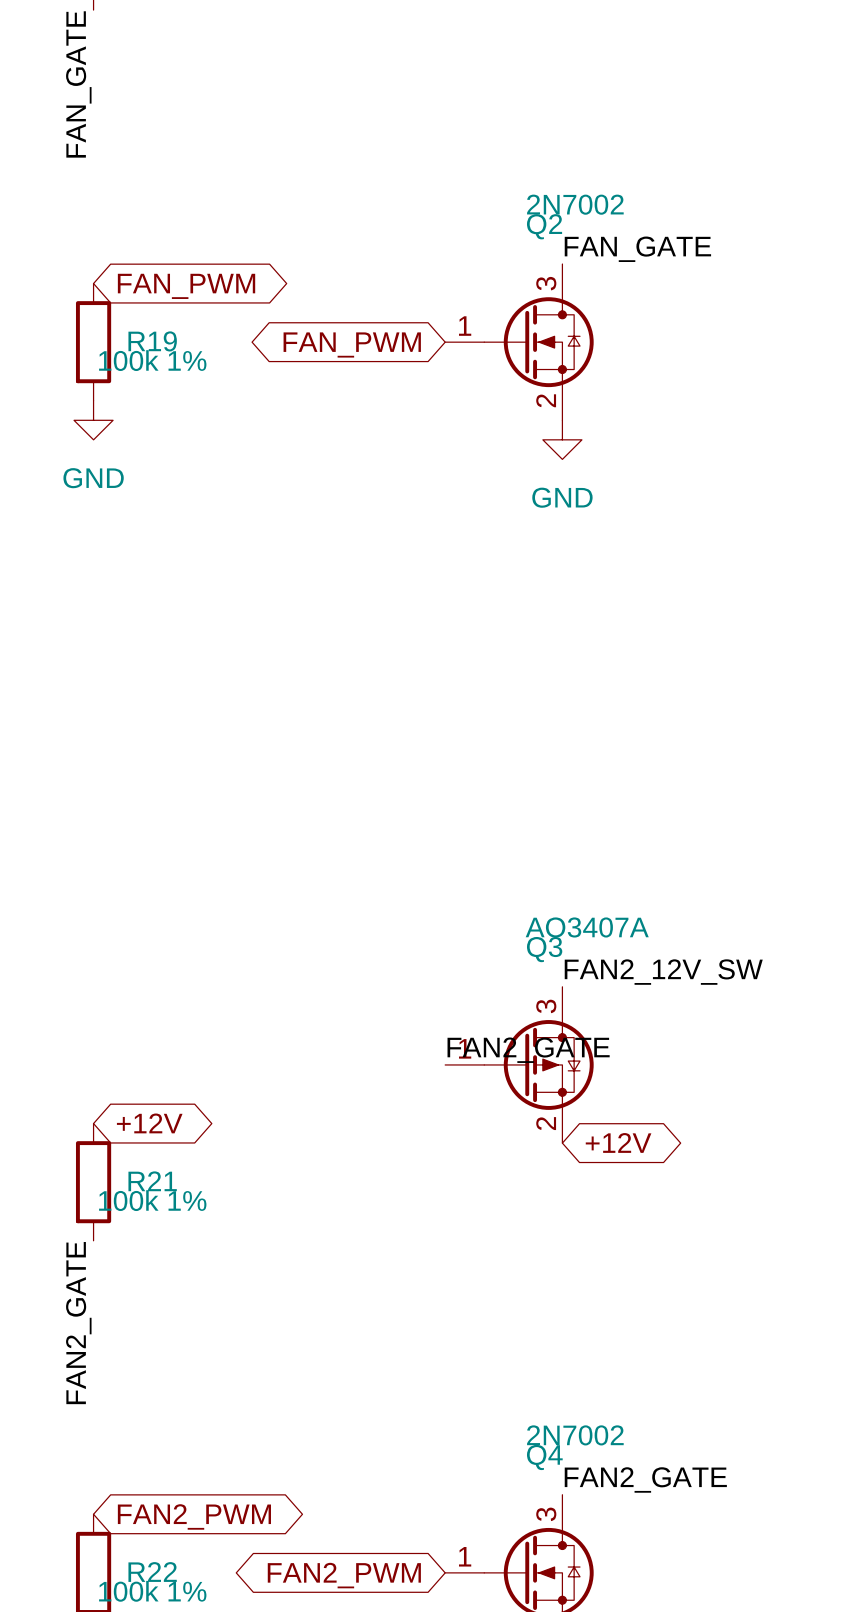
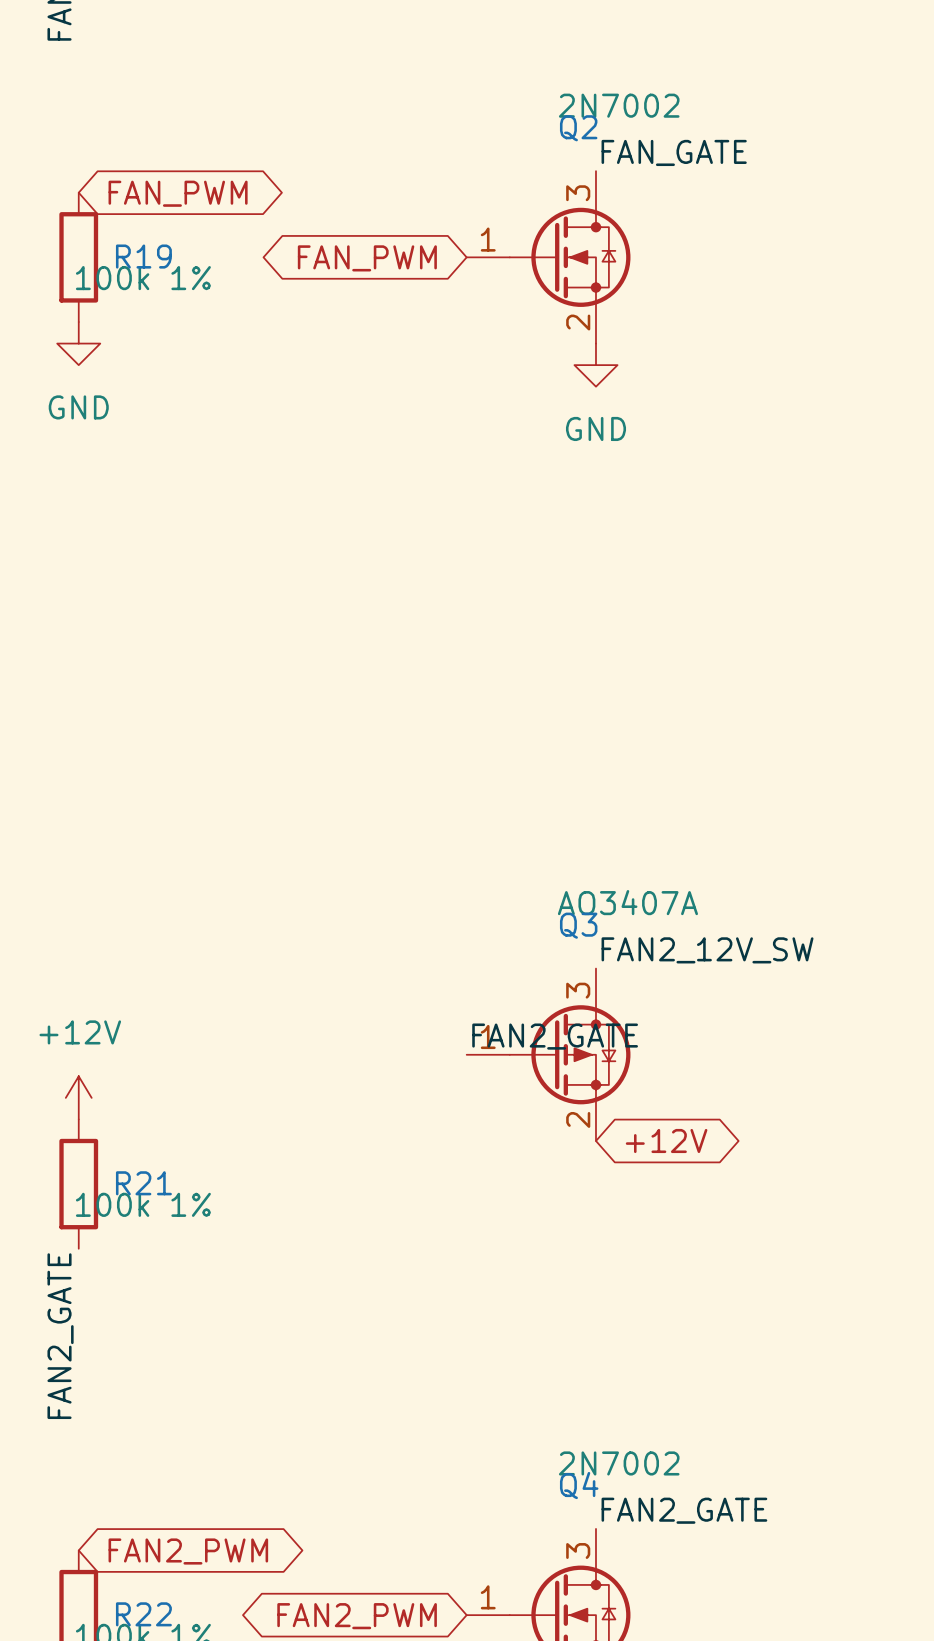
power symbol: none -> +12V (78, 1097)
global label: +12V (149, 1123) -> none

